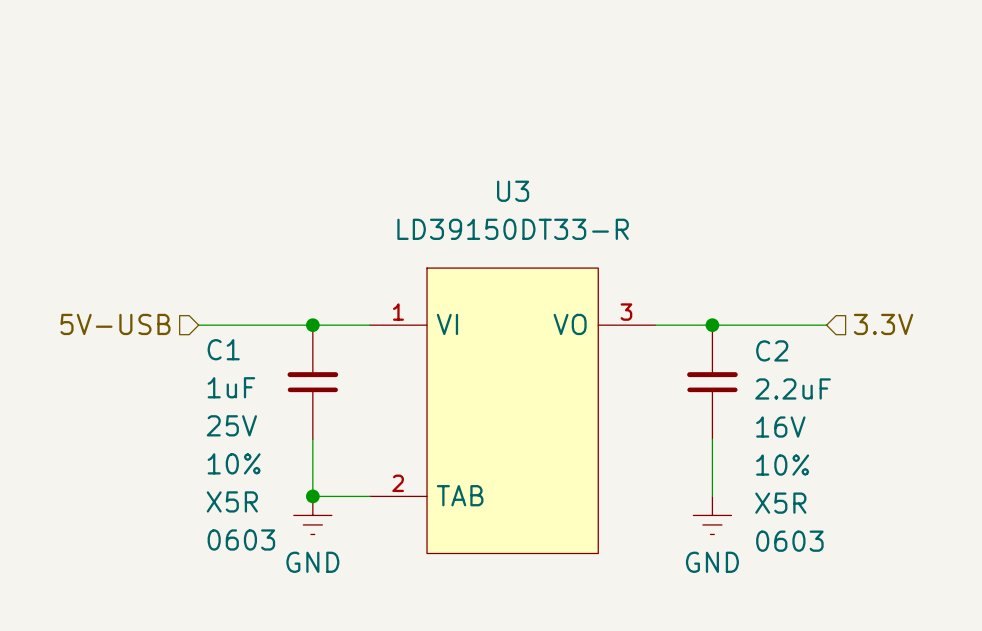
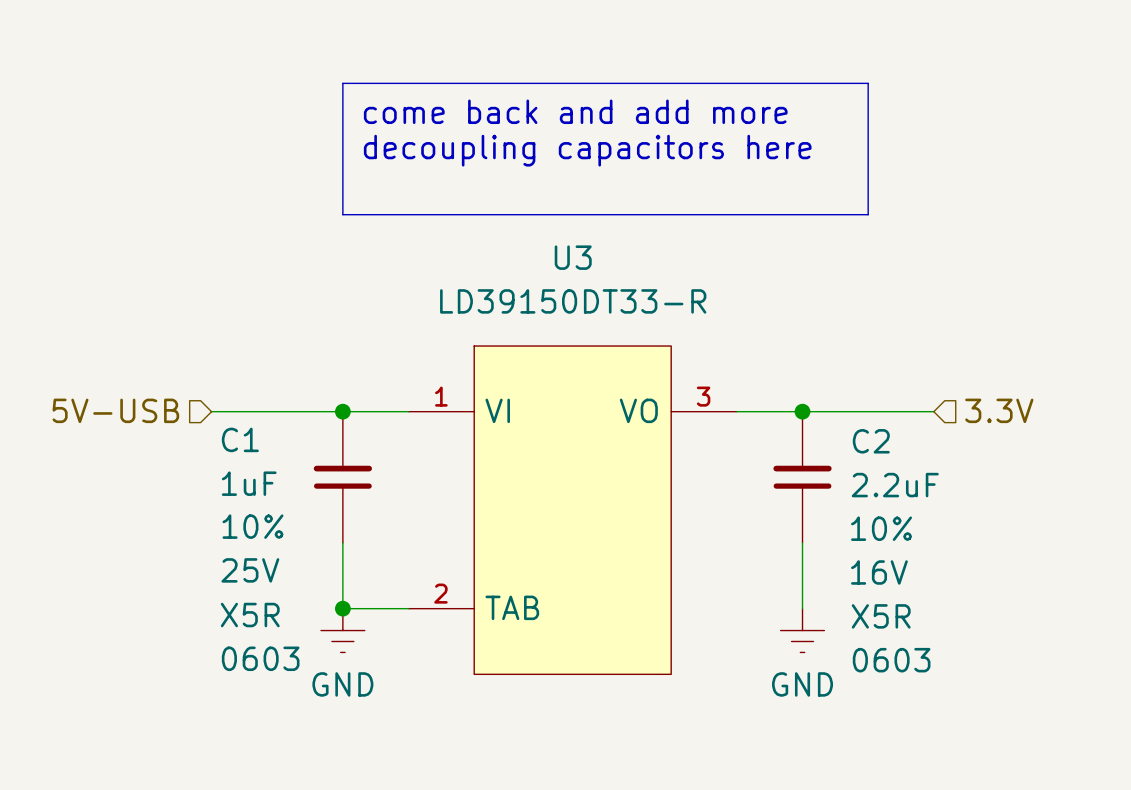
line: none -> (342, 83) (868, 83) (868, 214) (342, 214) (342, 83)
text: none -> come back and add more (575, 111)
text: none -> decoupling capacitors here (587, 150)
C1 text position: 25V (231, 425) -> 25V (250, 570)
C2 text position: 16V (780, 427) -> 16V (879, 572)
C1 text position: 10% (234, 463) -> 10% (252, 526)
C2 text position: 10% (782, 465) -> 10% (881, 528)

